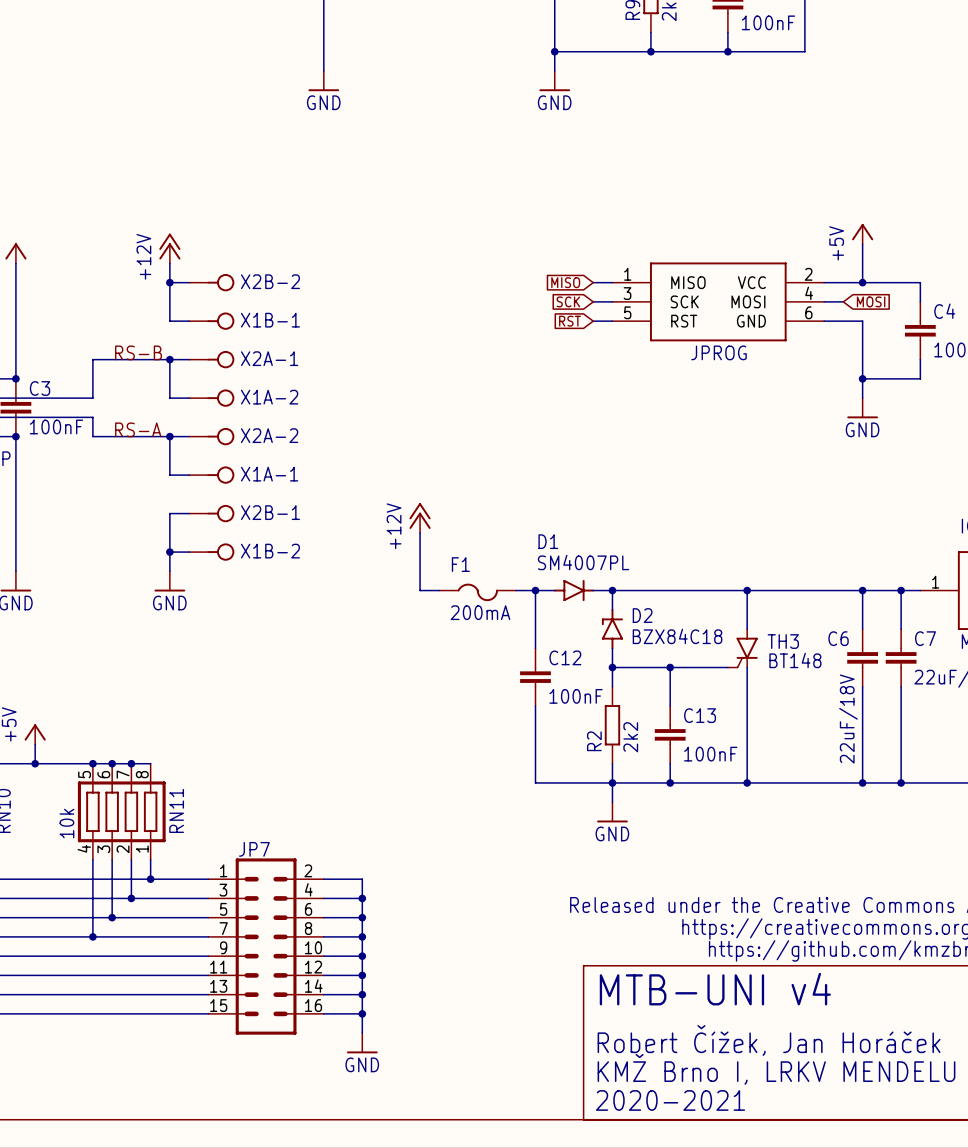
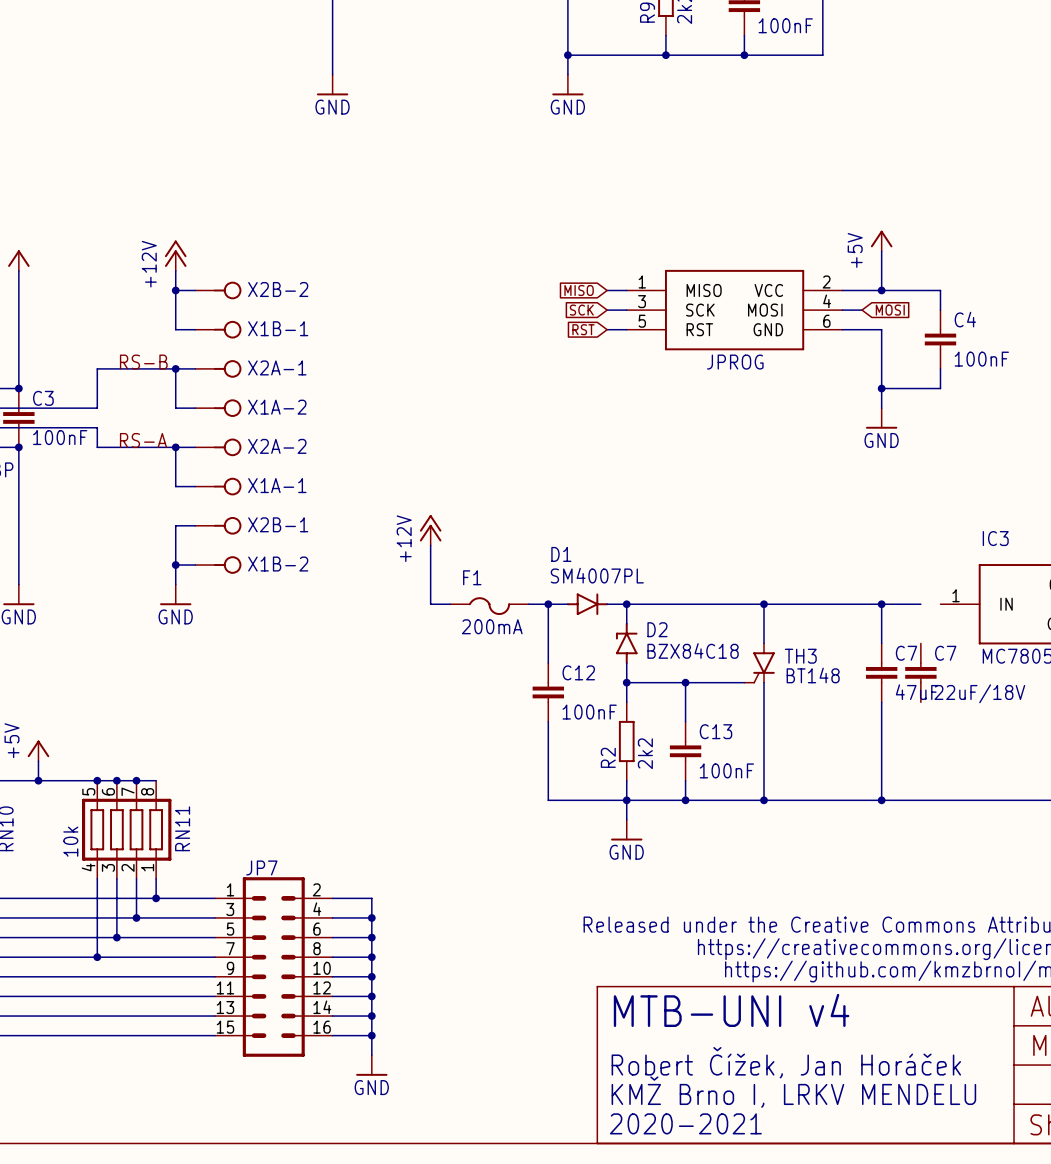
junction: (901, 590) -> none
wire: (920, 590) (901, 590) (901, 629) -> none
C6 name: C6 (838, 638) -> C7 (906, 653)
wire: (901, 686) (901, 782) -> none
C6 value: 22uF/18V (848, 719) -> 47uF (917, 692)
junction: (901, 782) -> none

